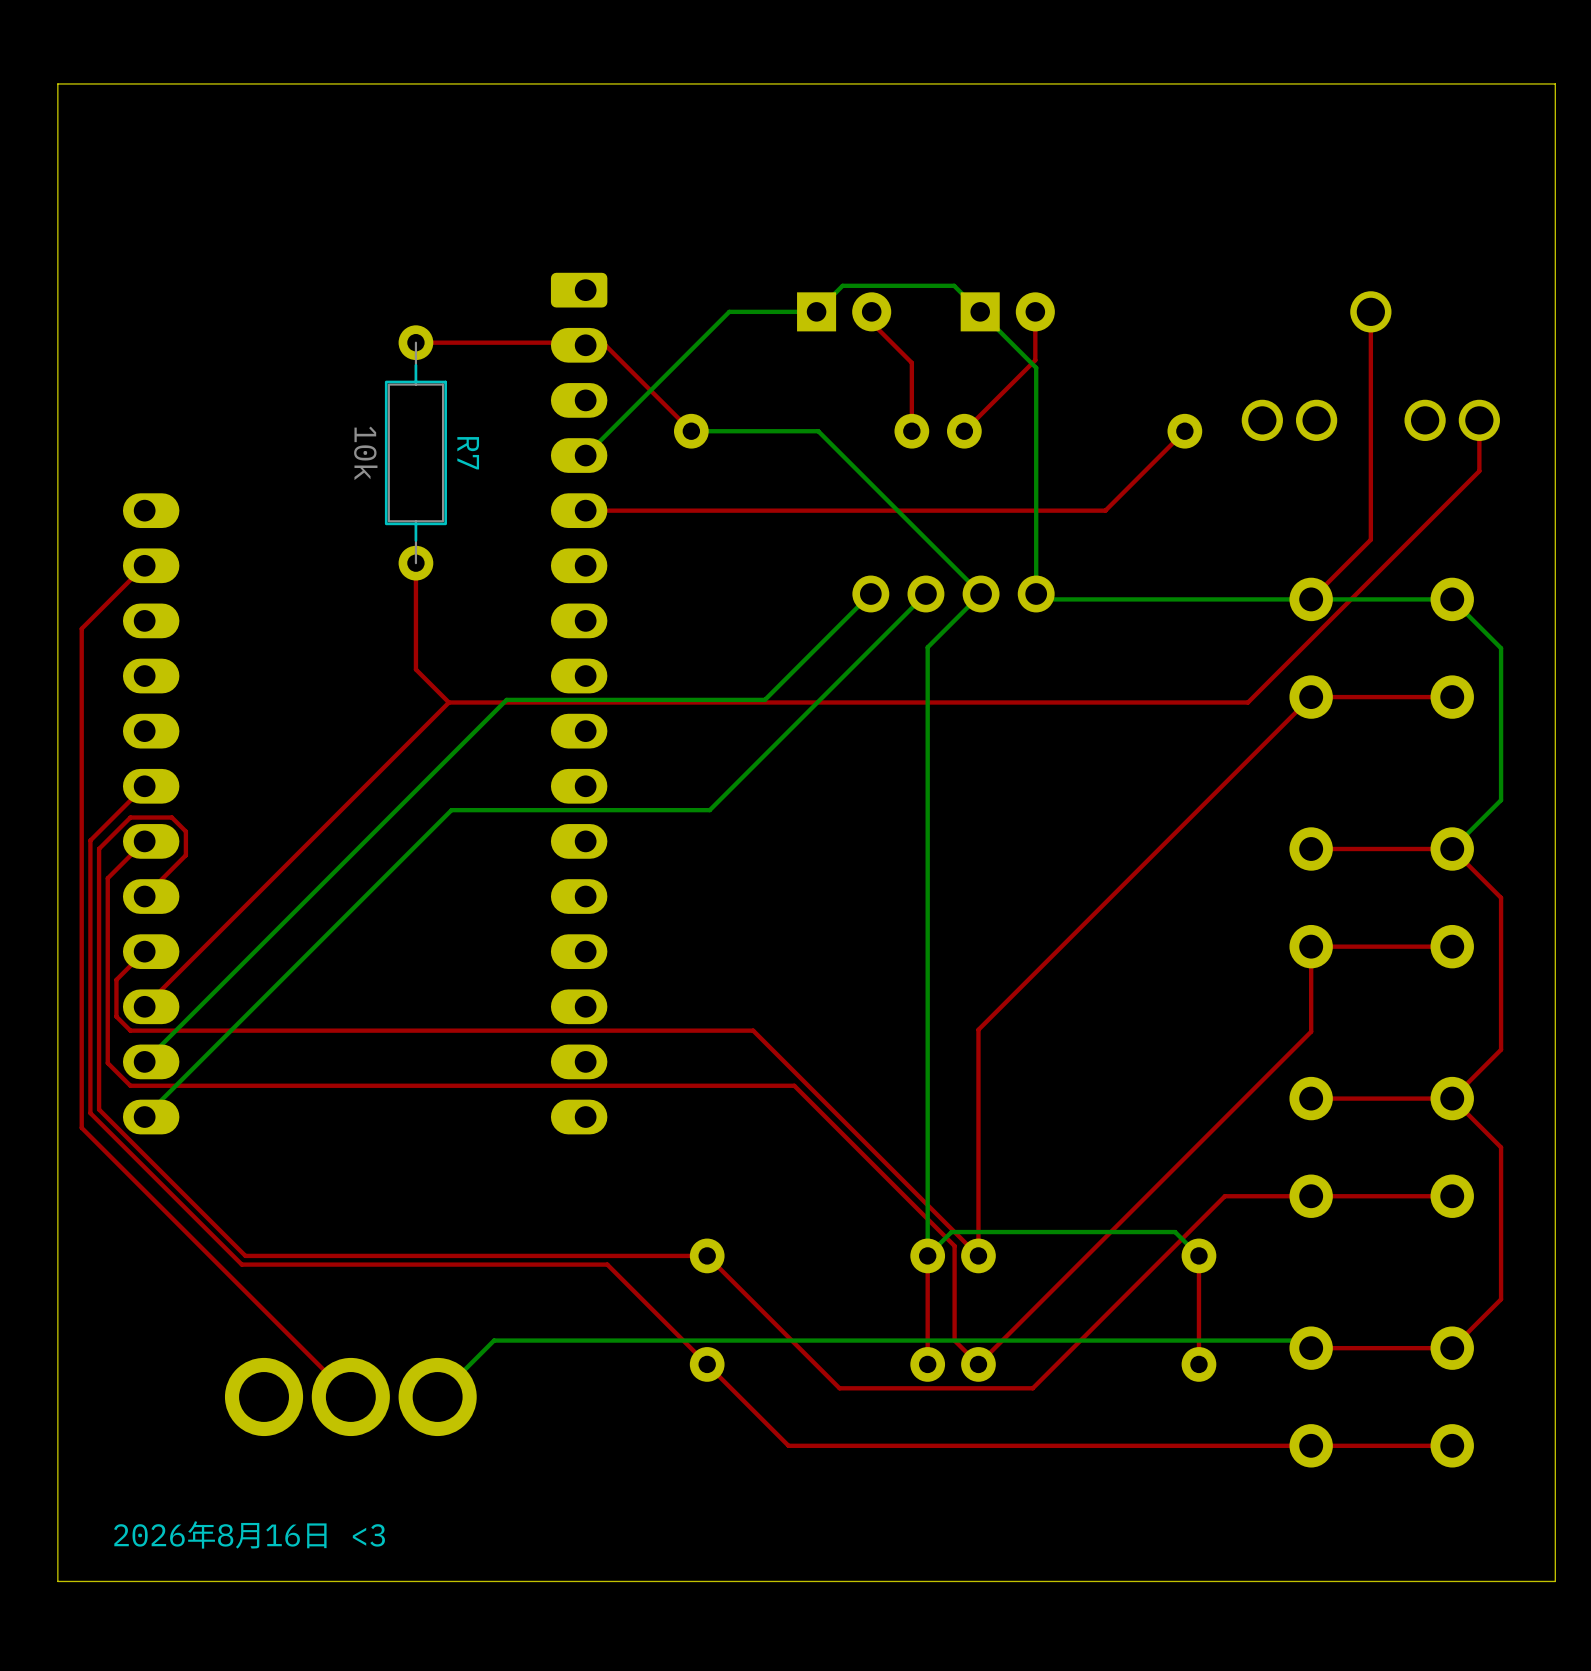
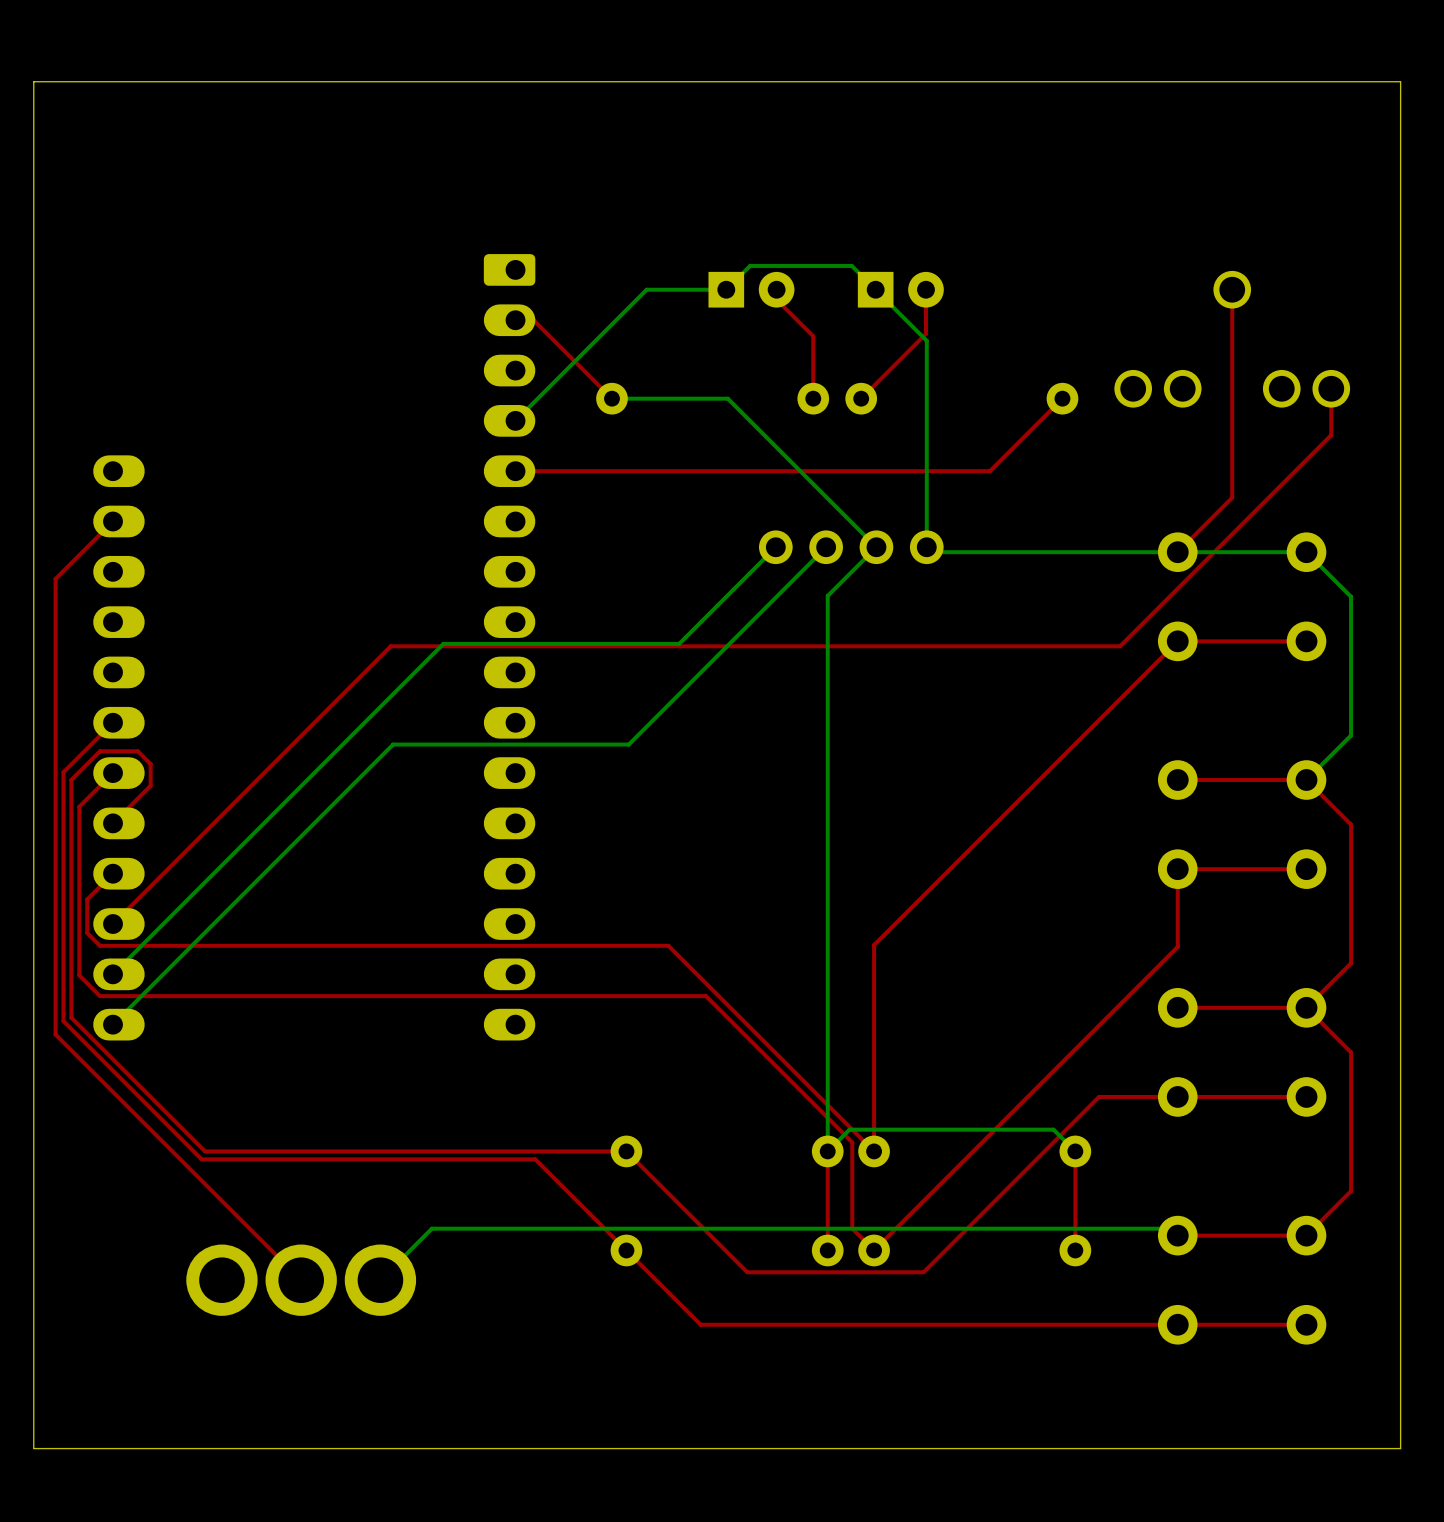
top track: (415, 342) (566, 342) (568, 345) (585, 345) -> none
R7: 10k (415, 452) -> none
top track: (415, 563) (415, 669) (448, 702) -> none
text: 2026年8月16日 <3 (249, 1534) -> none

